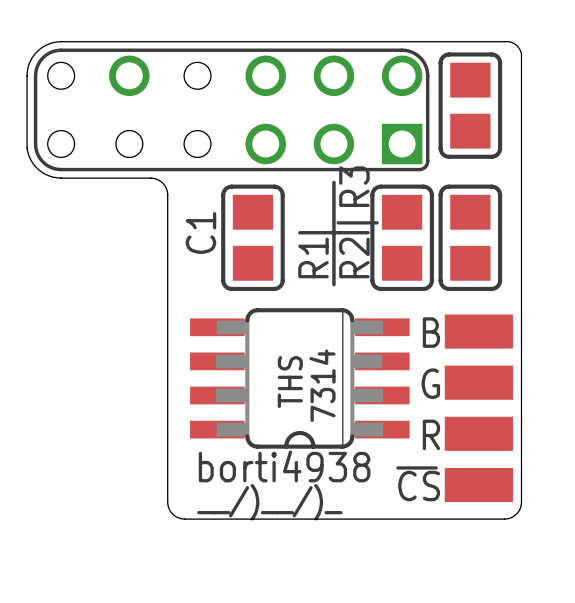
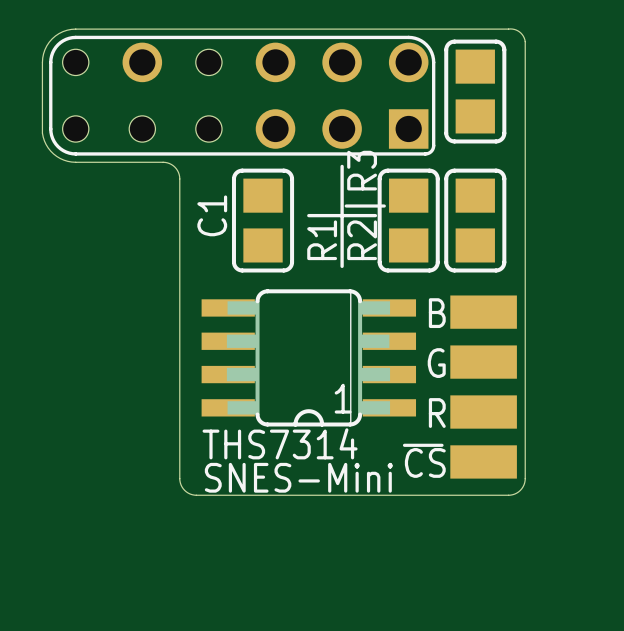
text: THS (290, 382) -> none
text: 7314 (322, 385) -> none
text: none -> 1 (343, 398)
text: borti4938 (284, 466) -> THS7314 (280, 443)
text: __/)__/)_ (269, 502) -> SNES-Mini (298, 477)

